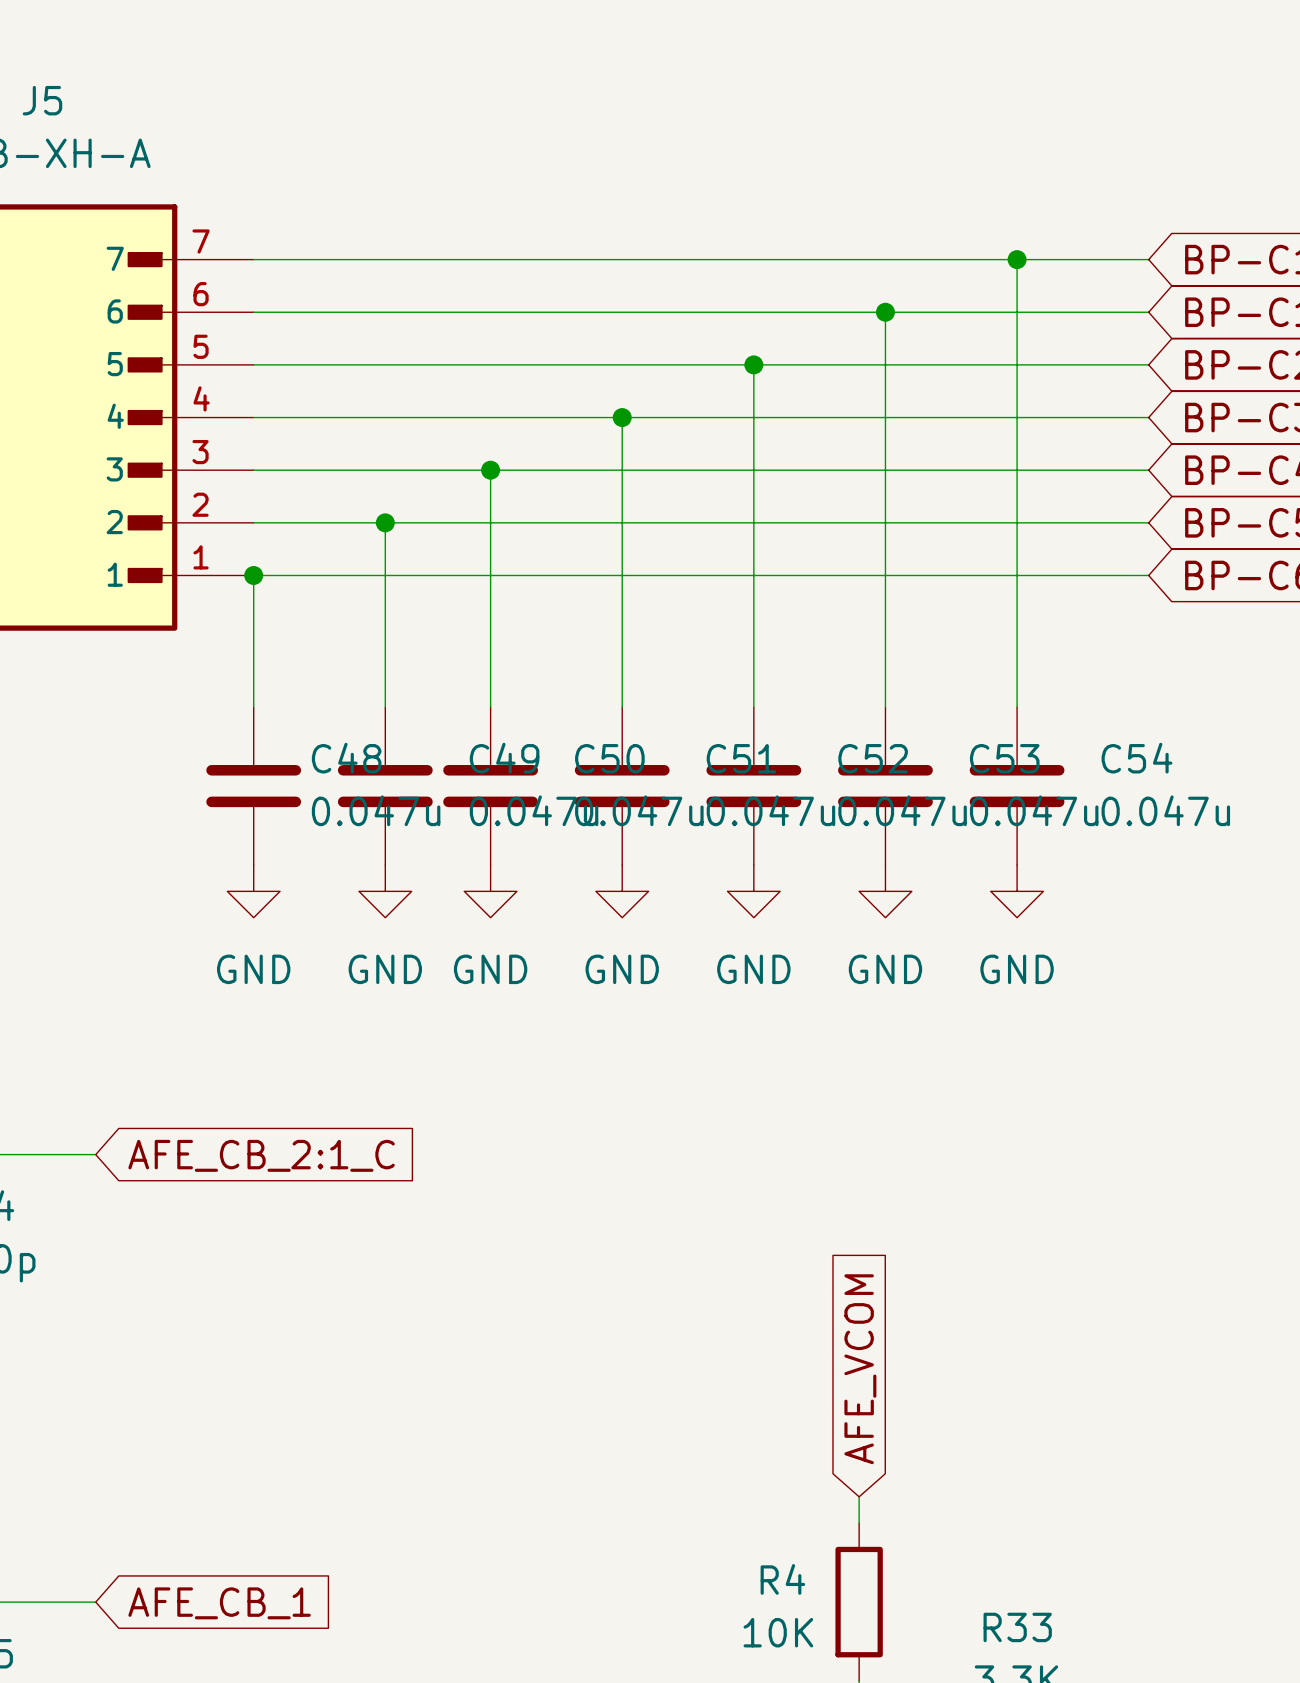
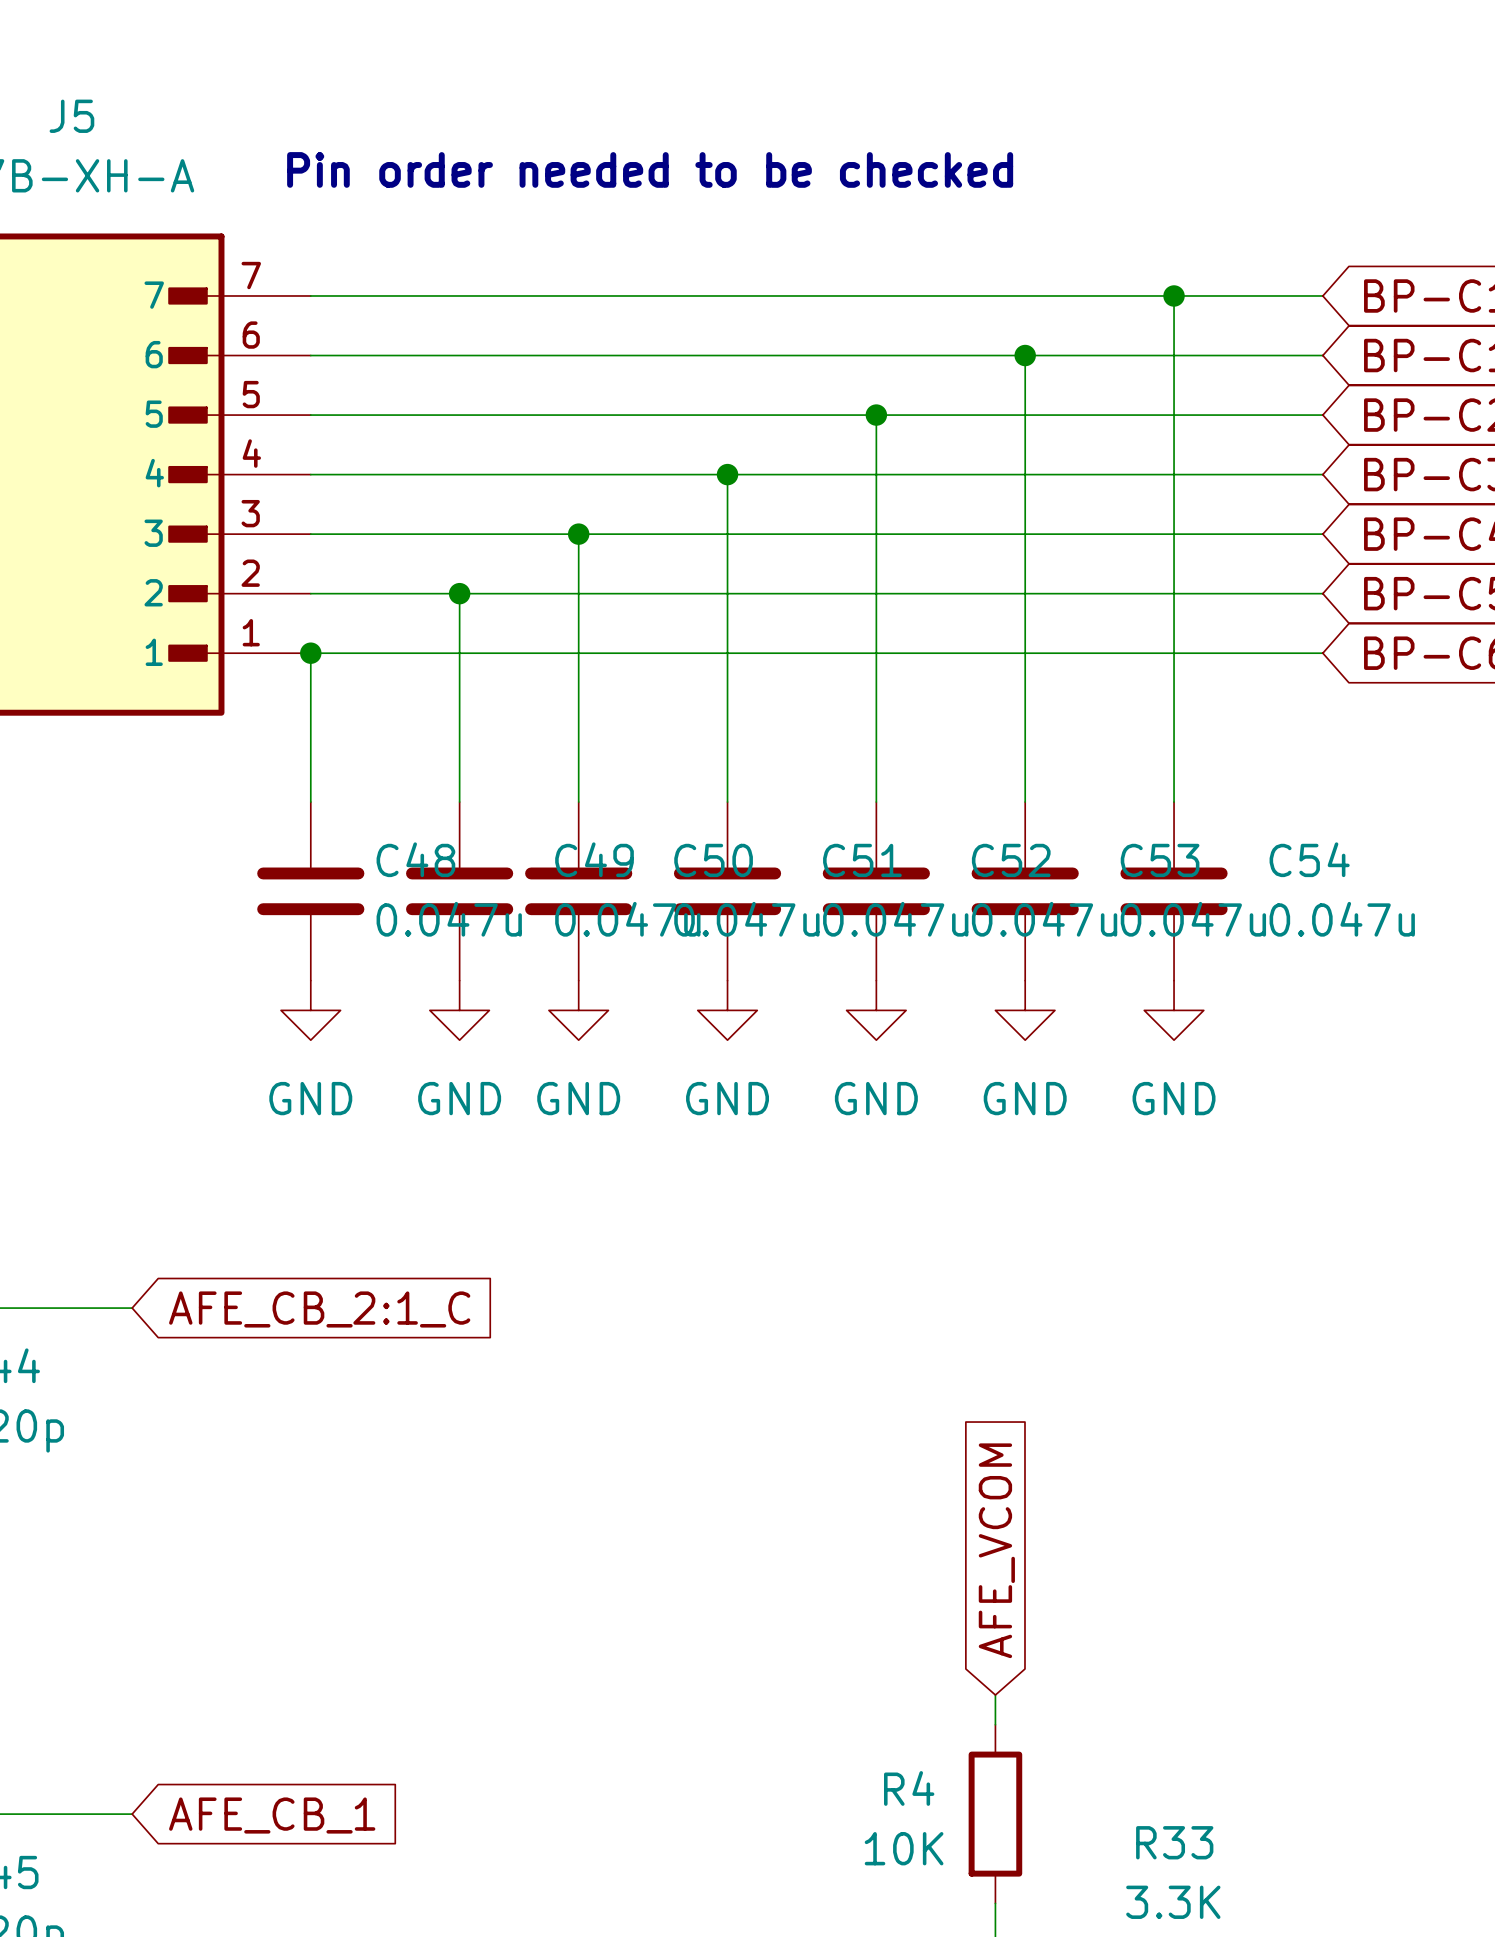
text: none -> Pin order needed to be checked (650, 169)

